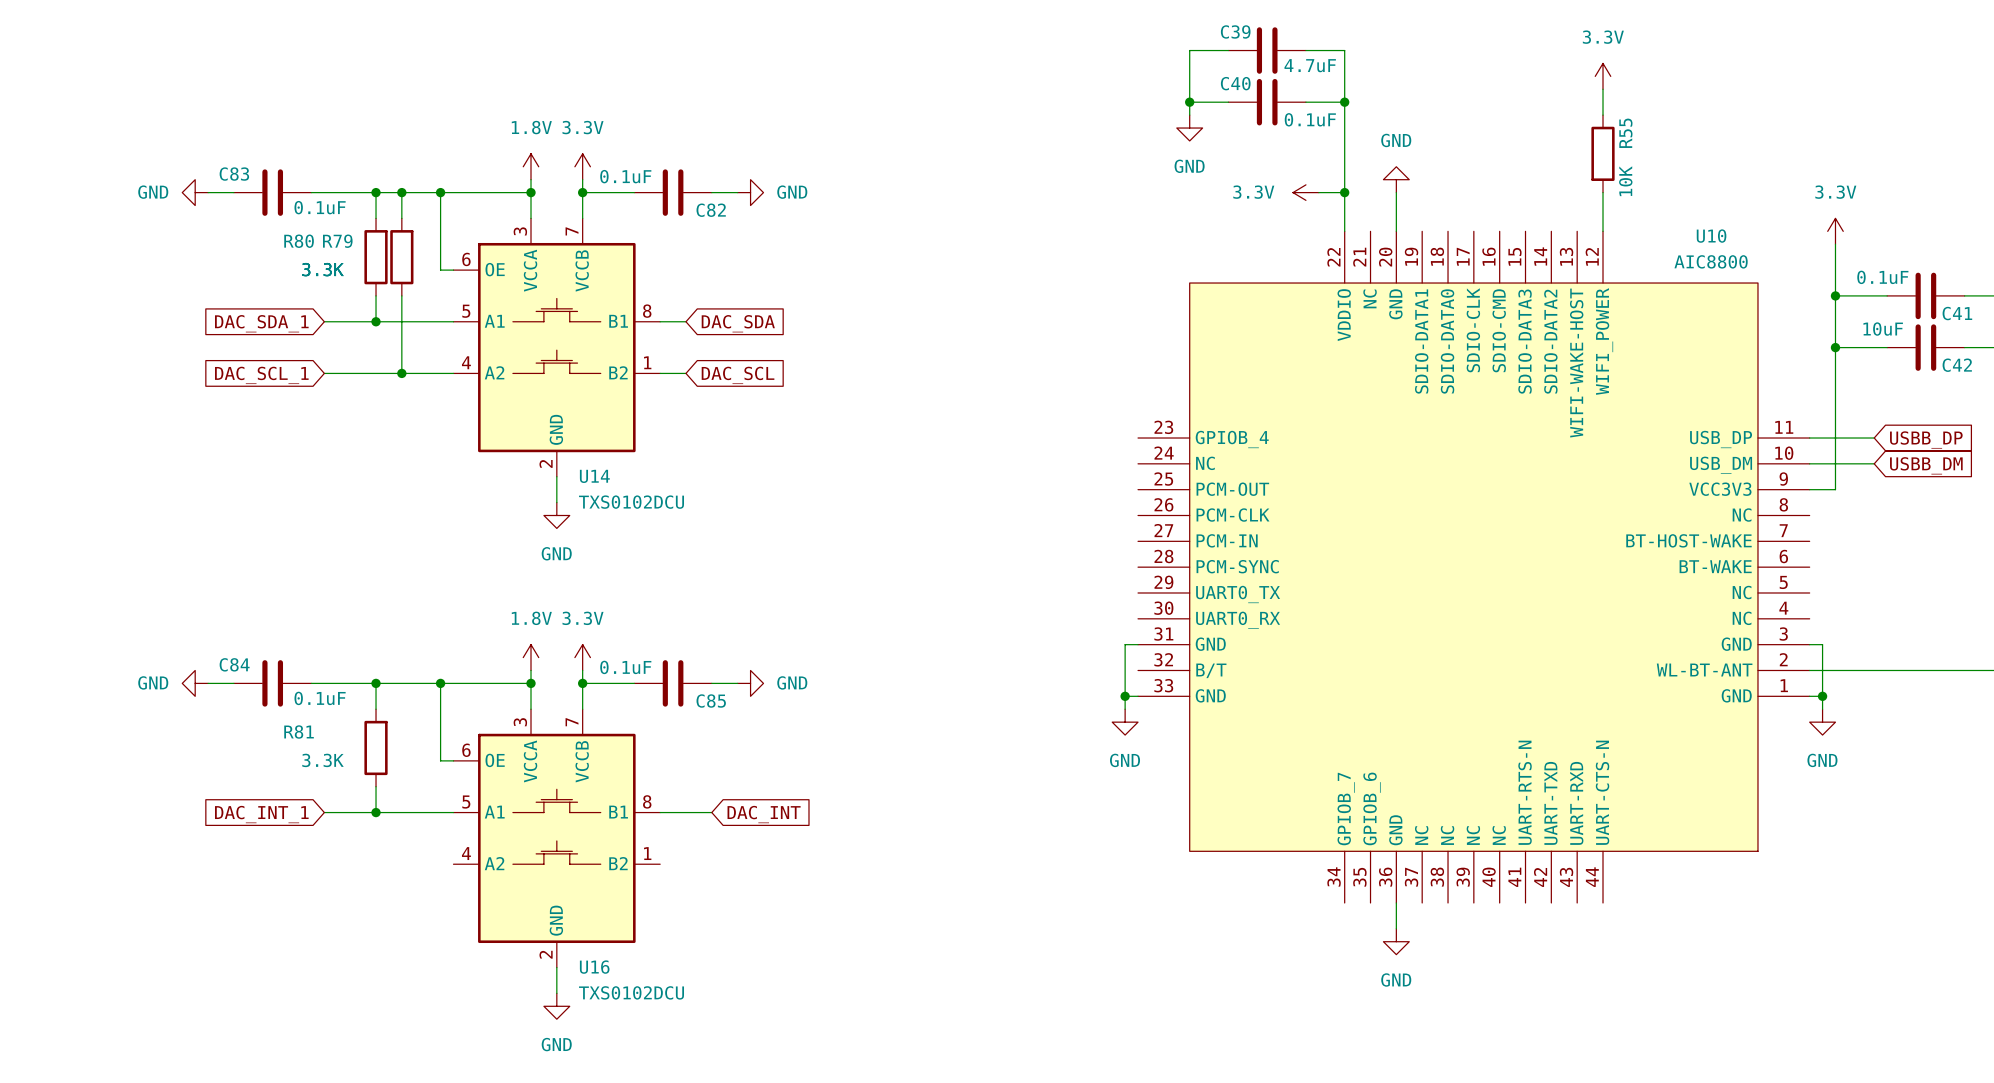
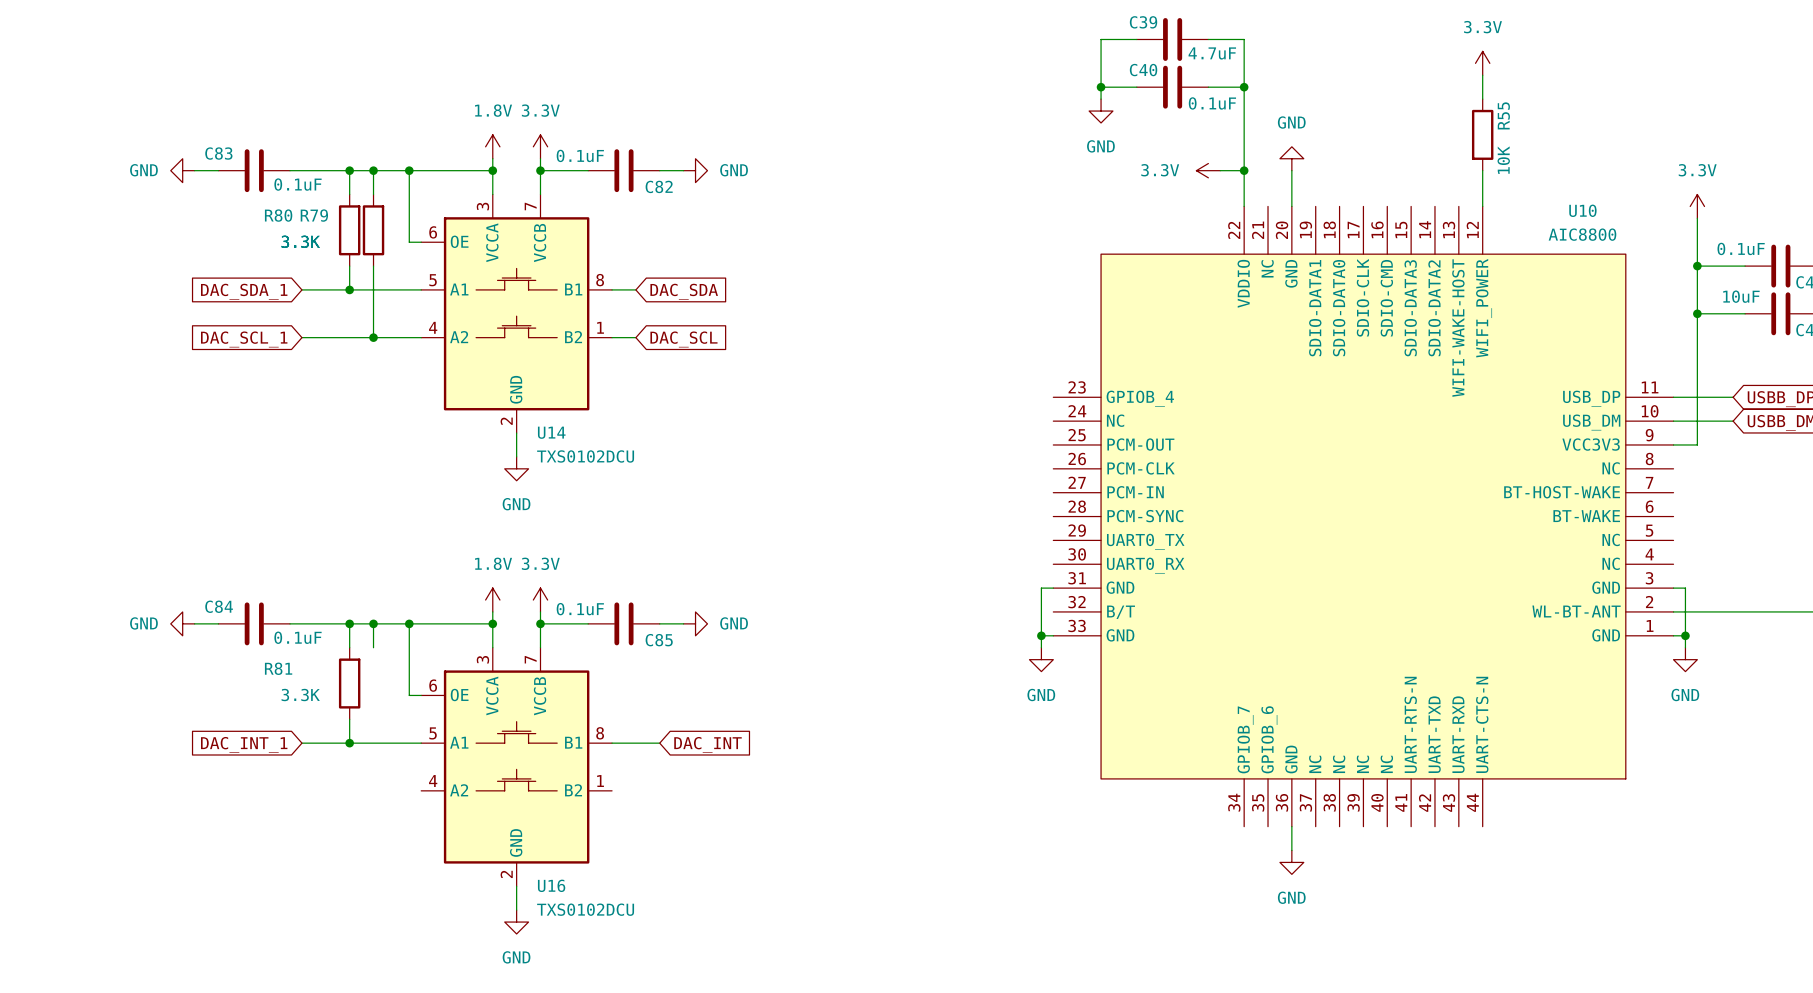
wire: none -> (373, 623) (373, 647)
junction: none -> (373, 623)

